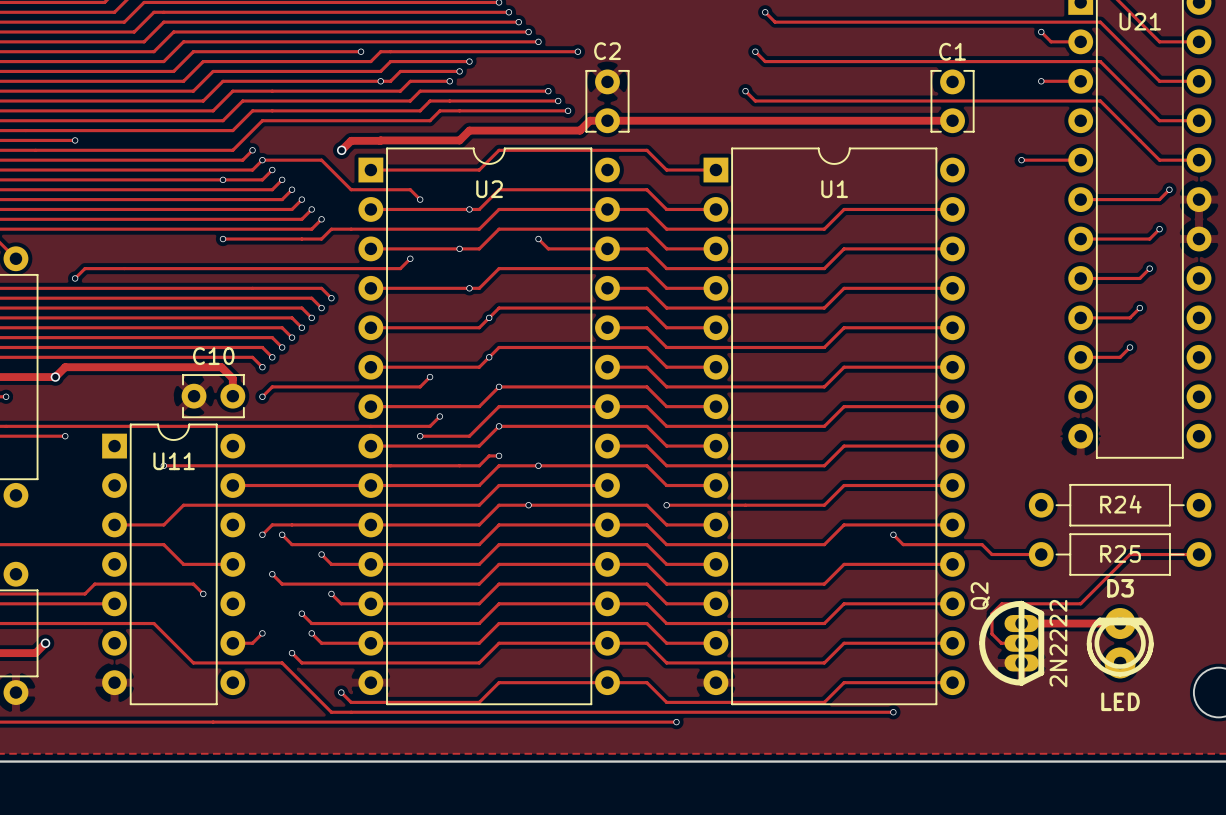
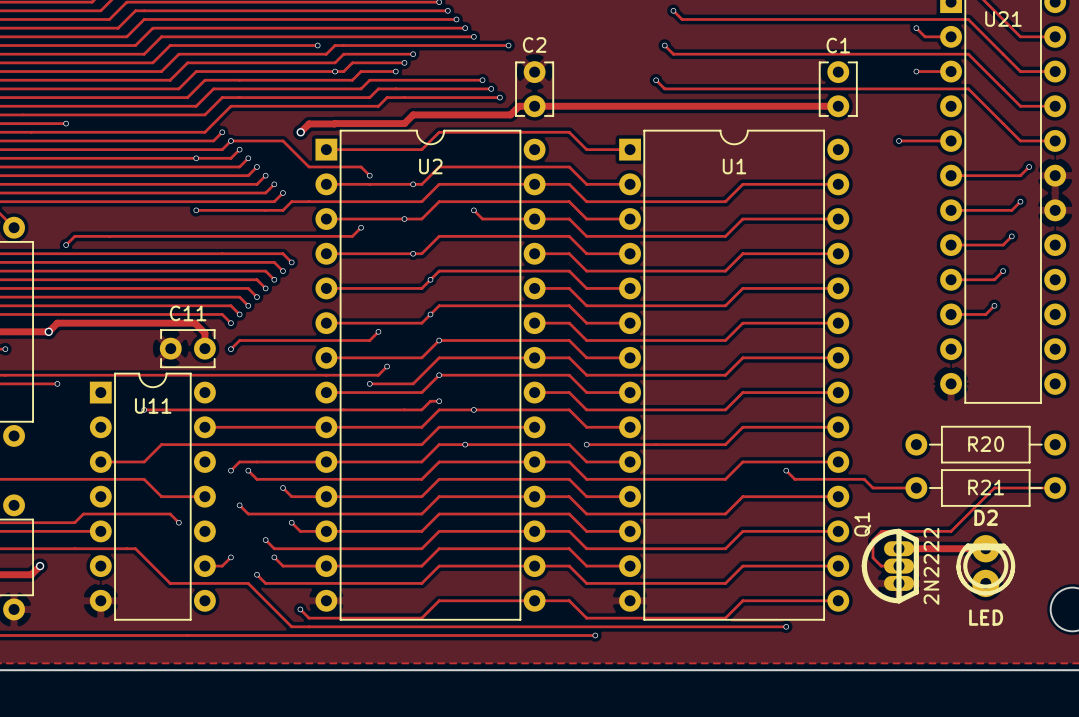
C10 name: C10 (213, 356) -> C11 (188, 313)
R24 name: R24 (1120, 504) -> R20 (986, 444)
R25 name: R25 (1120, 553) -> R21 (986, 487)
D3 name: D3 (1120, 588) -> D2 (986, 517)
Q2 name: Q2 (980, 595) -> Q1 (862, 524)

